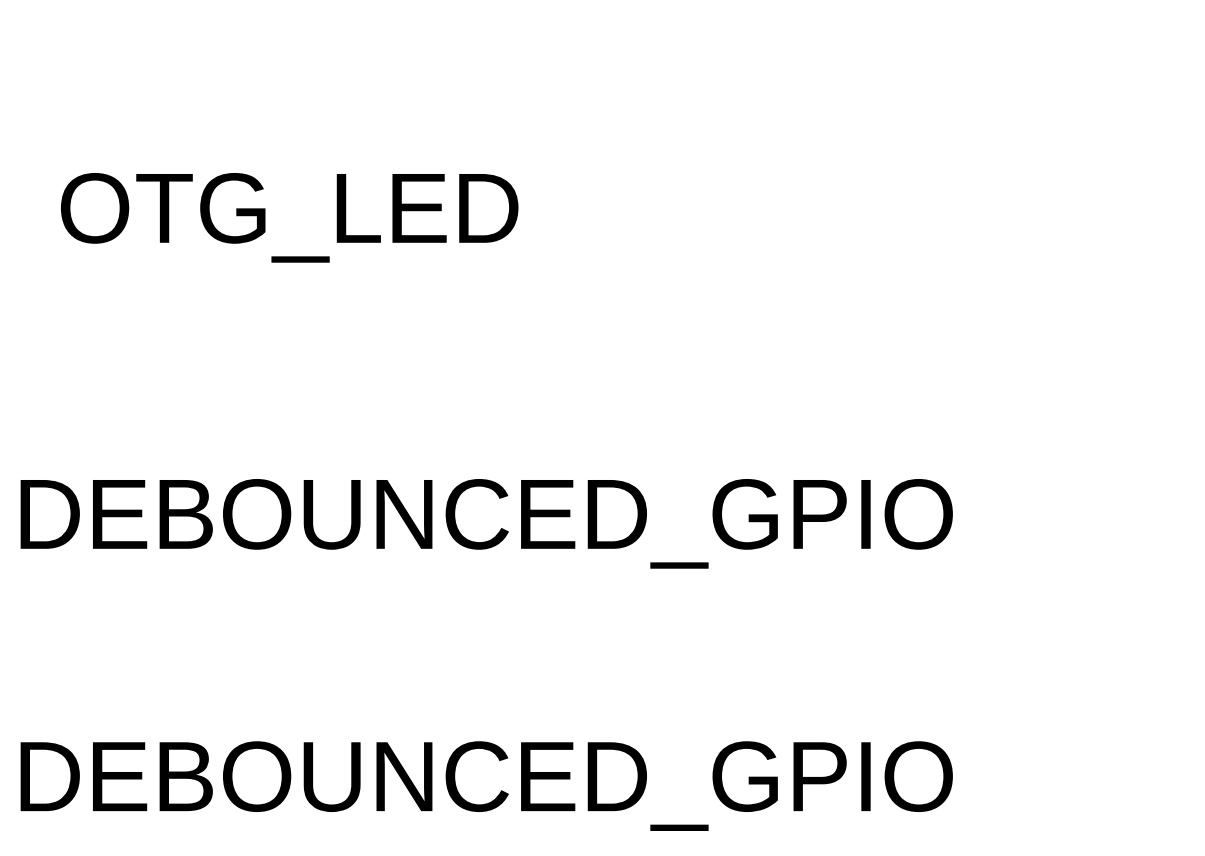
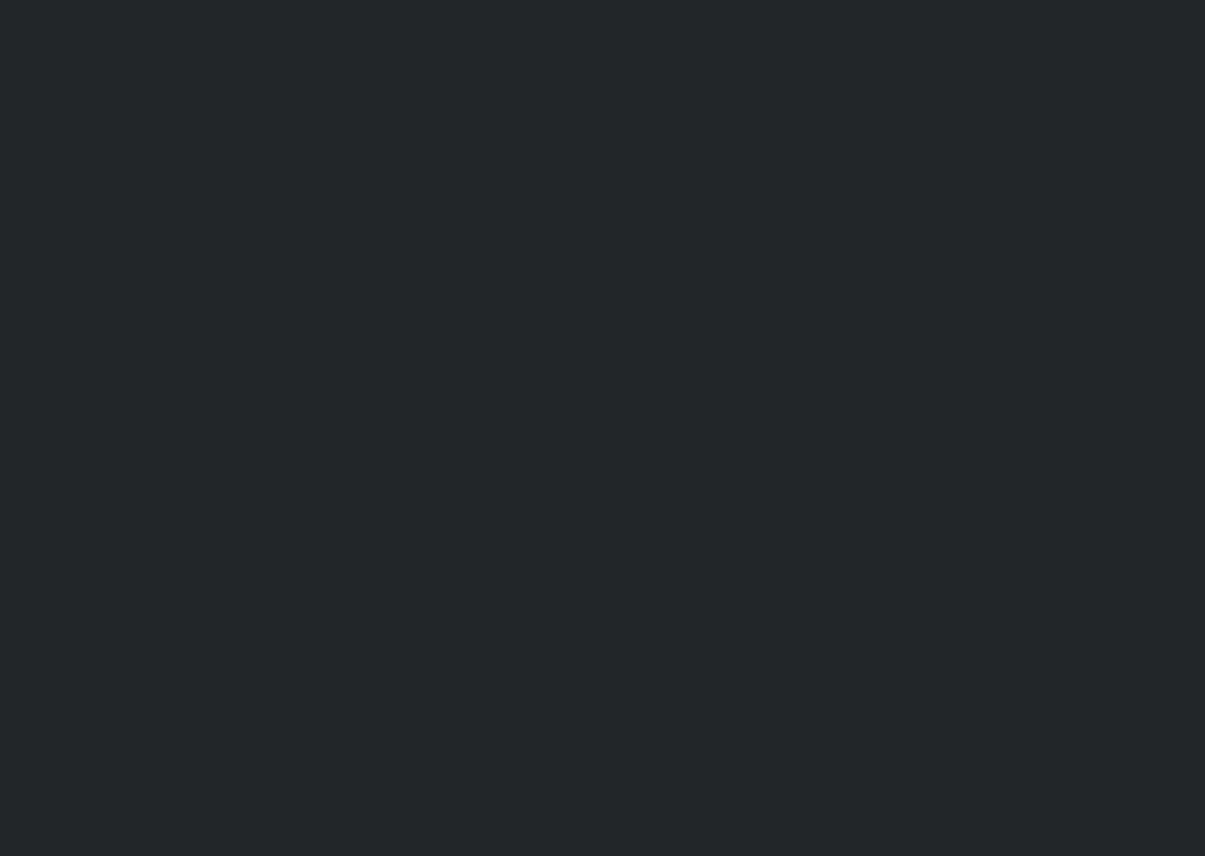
text: OTG_LED (289, 217) -> none
text: DEBOUNCED_GPIO (486, 523) -> none
text: DEBOUNCED_GPIO (486, 786) -> none

